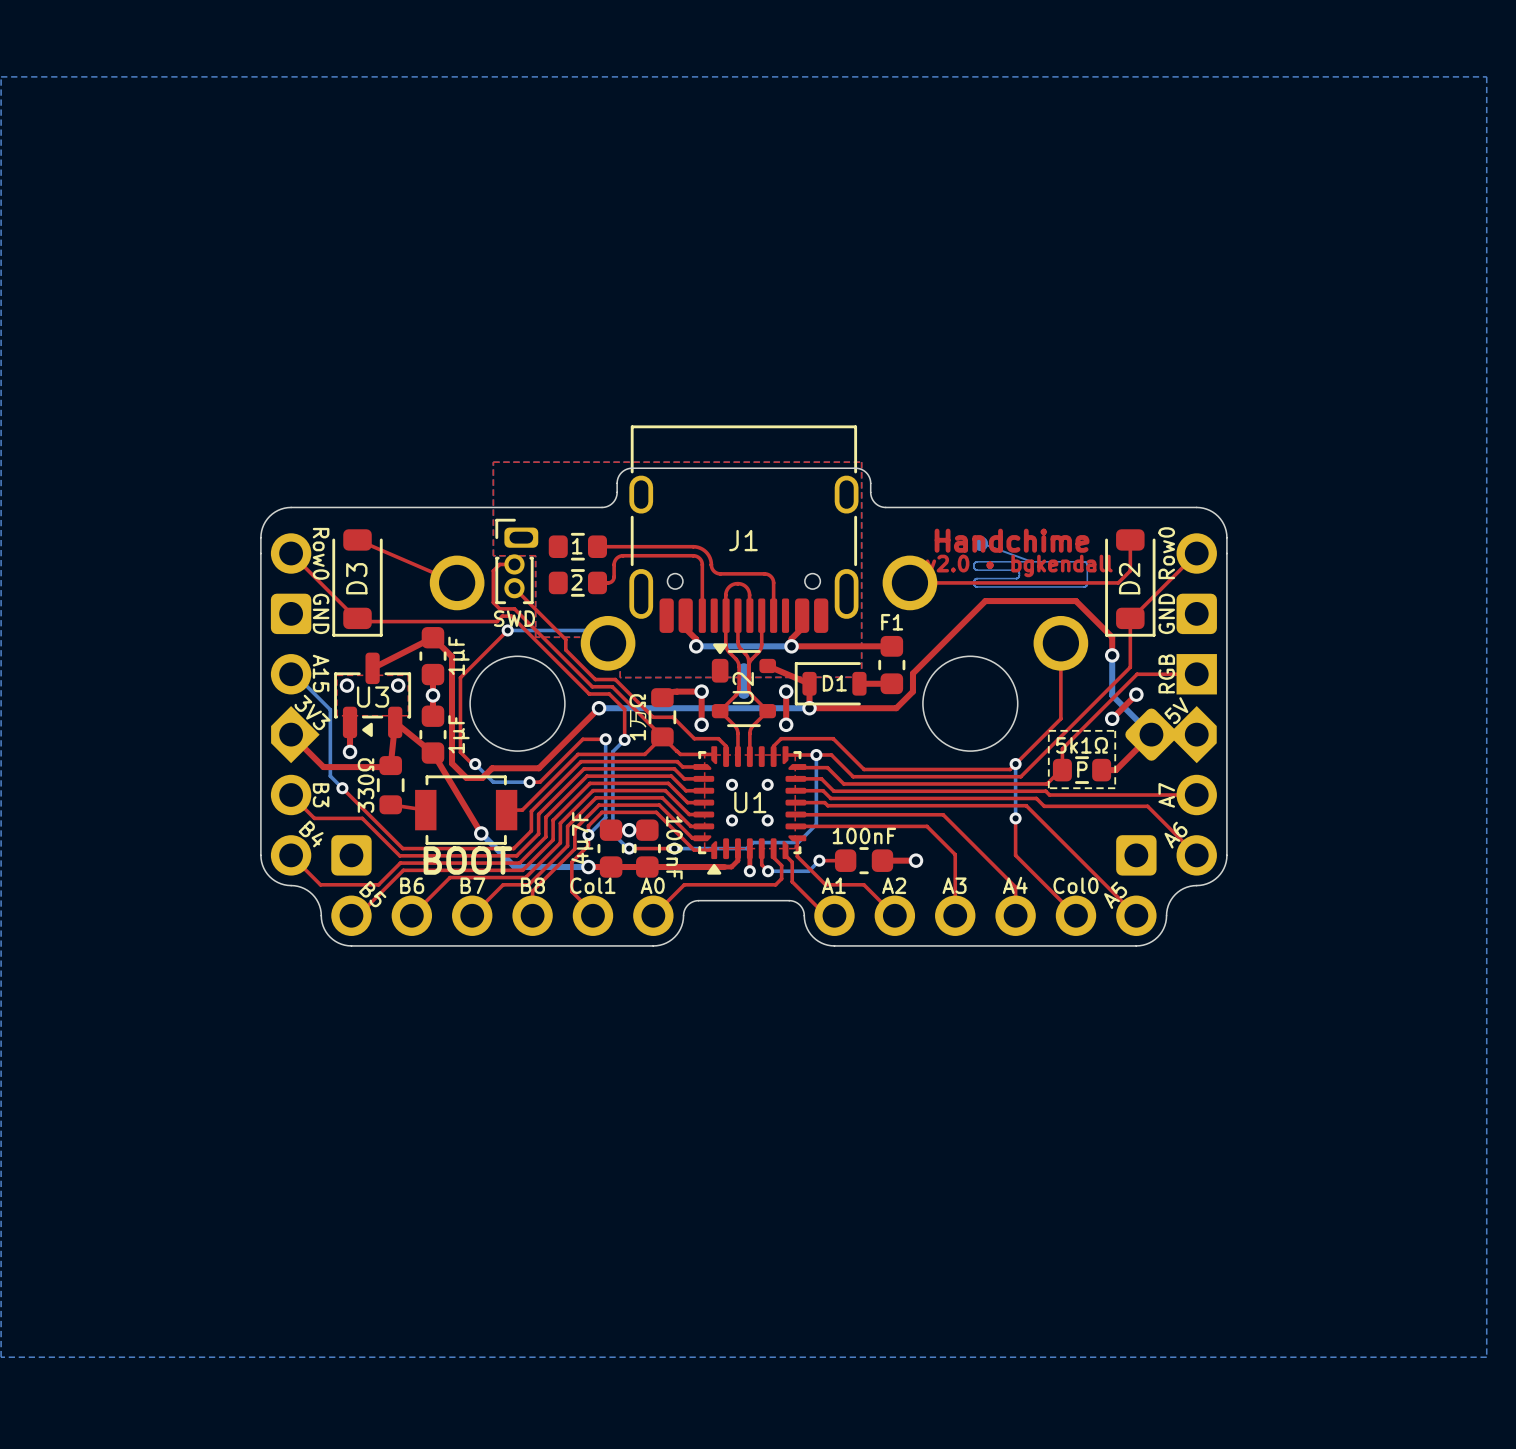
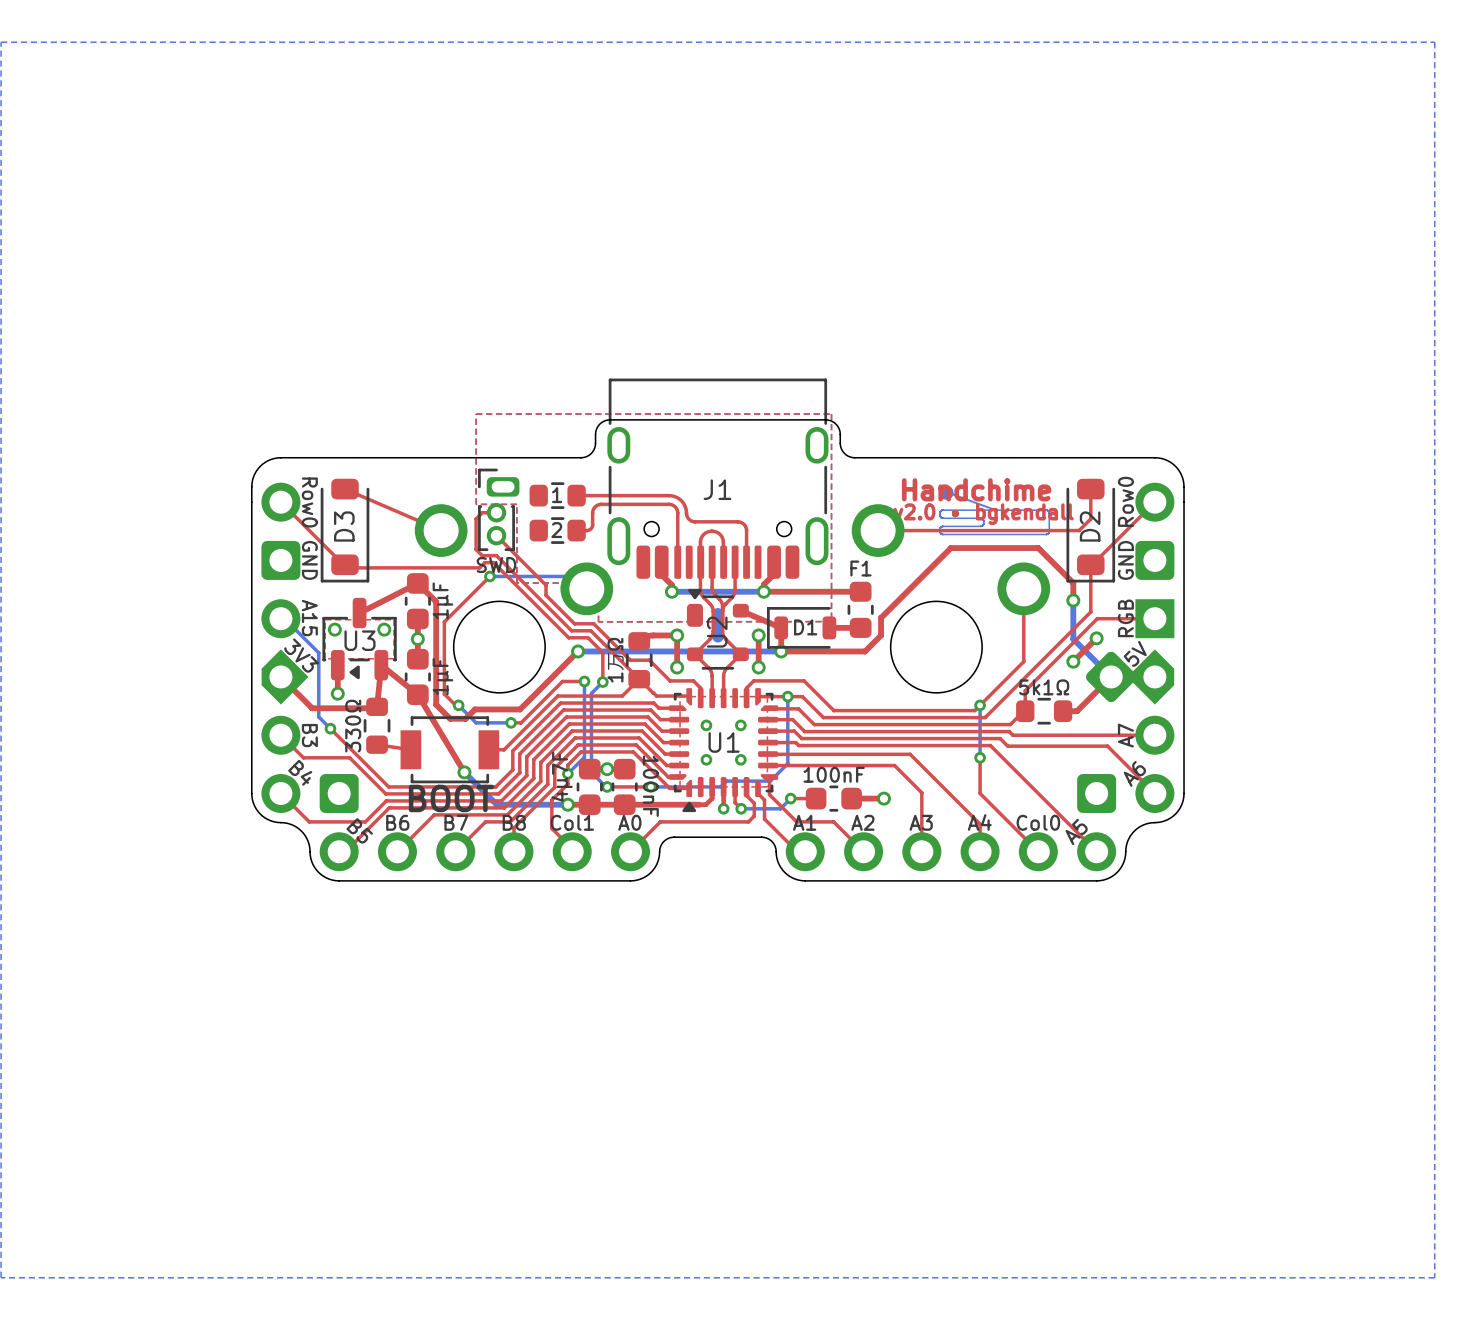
line: (1048, 730) (1115, 730) (1115, 788) (1048, 788) (1048, 730) -> none
part text: P (1082, 769) -> none

